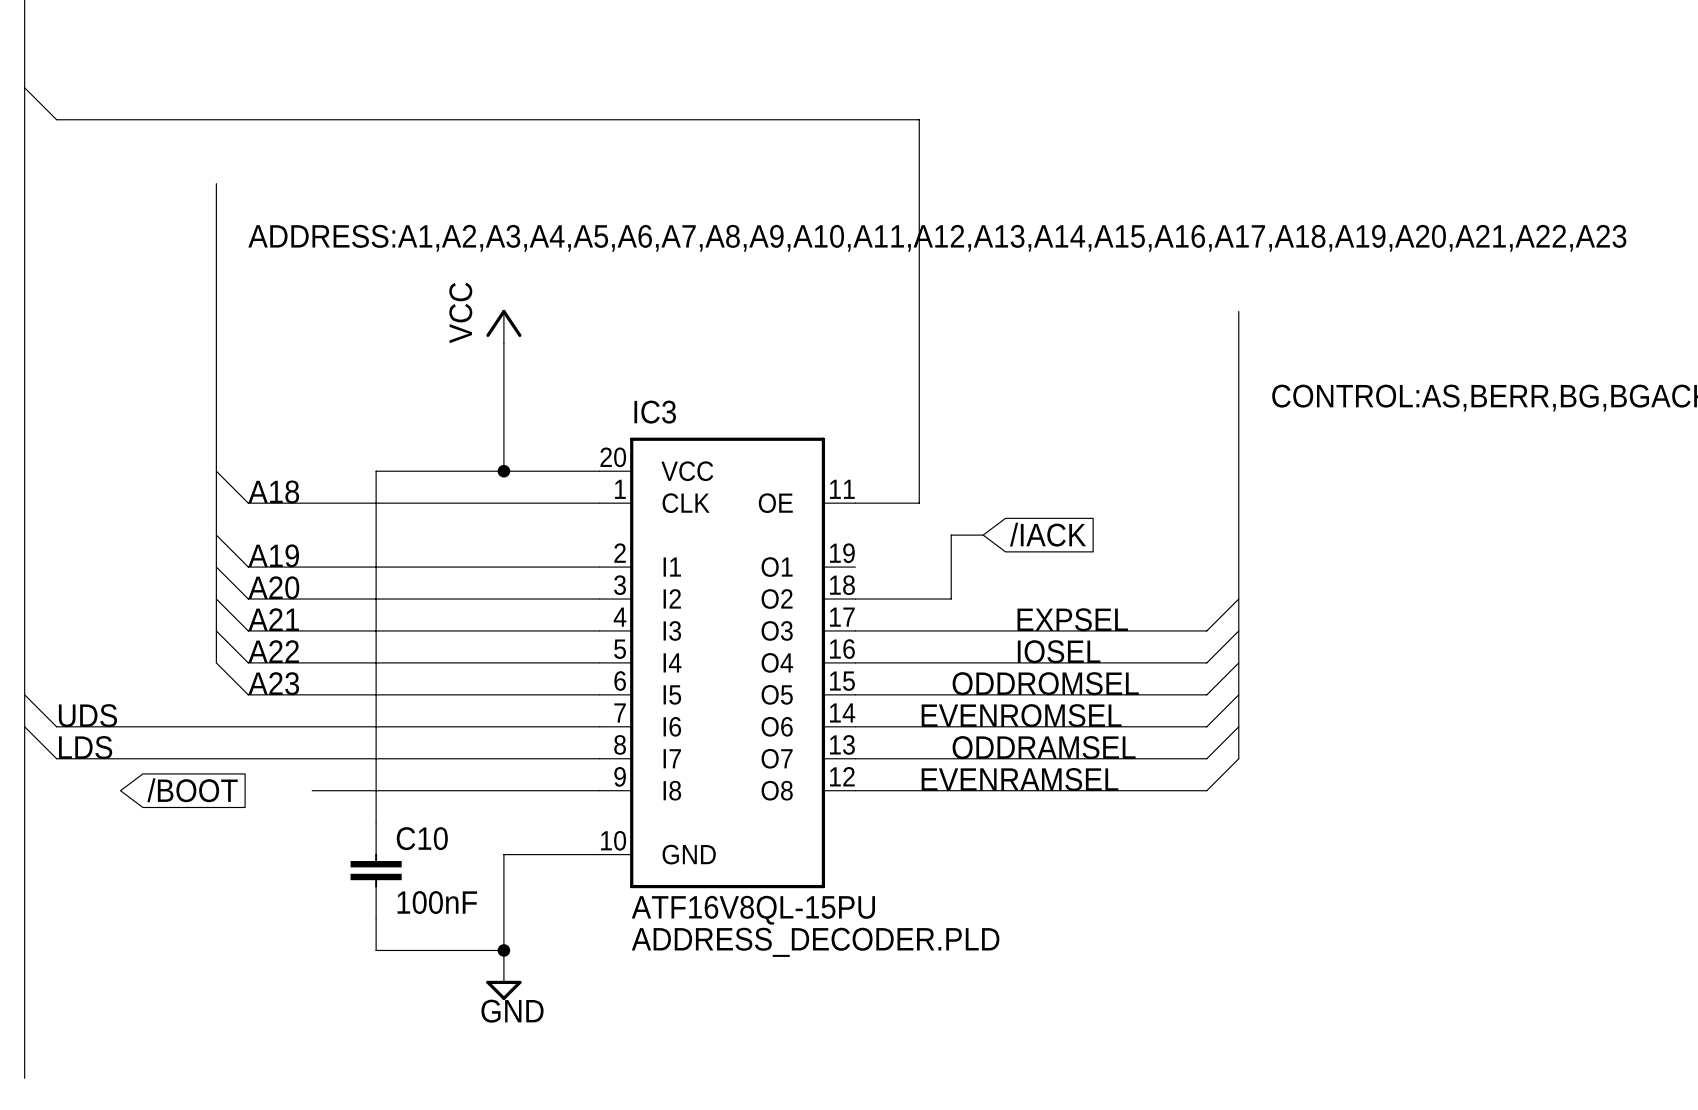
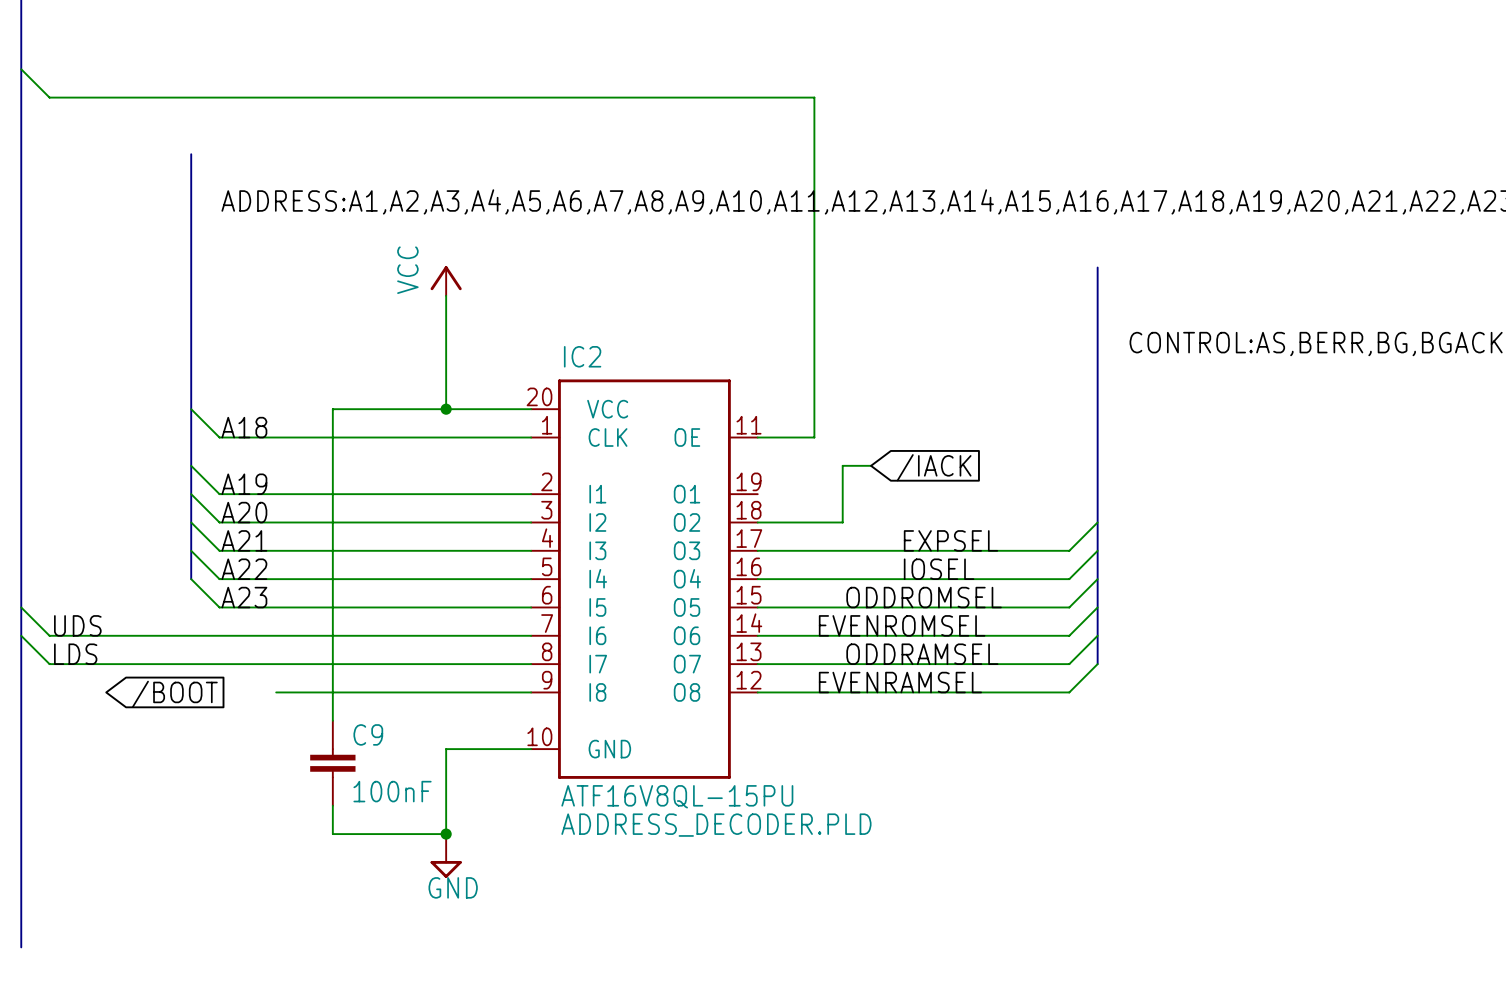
IC3 name: IC3 (655, 412) -> IC2 (582, 356)
C10 name: C10 (422, 838) -> C9 (368, 734)

